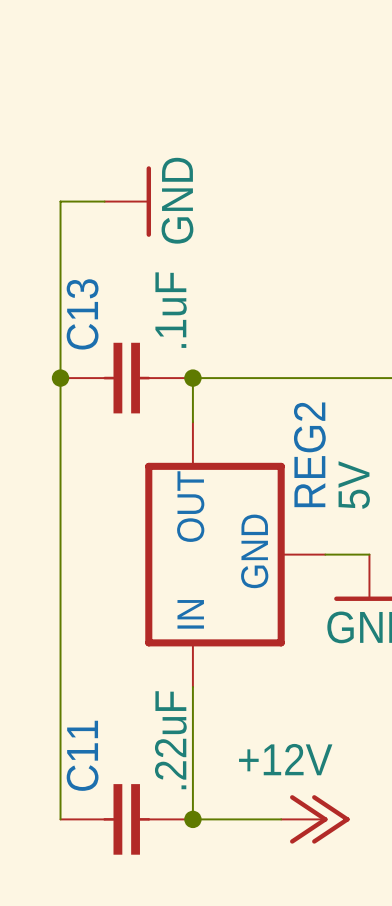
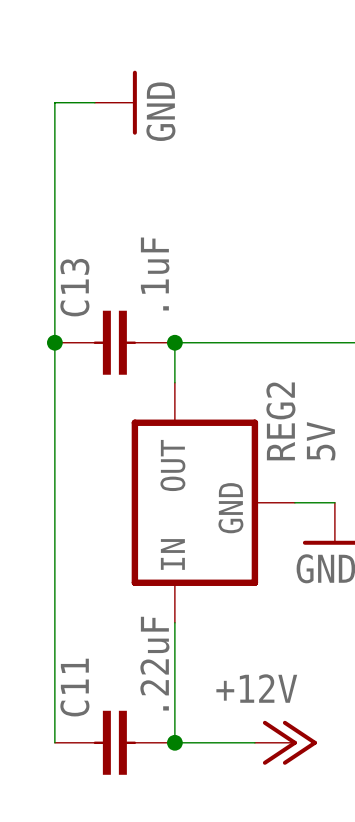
wire: (60, 201) (104, 201) -> (54, 182) (54, 102) (94, 102)
power symbol position: GND (127, 201) -> GND (115, 102)

